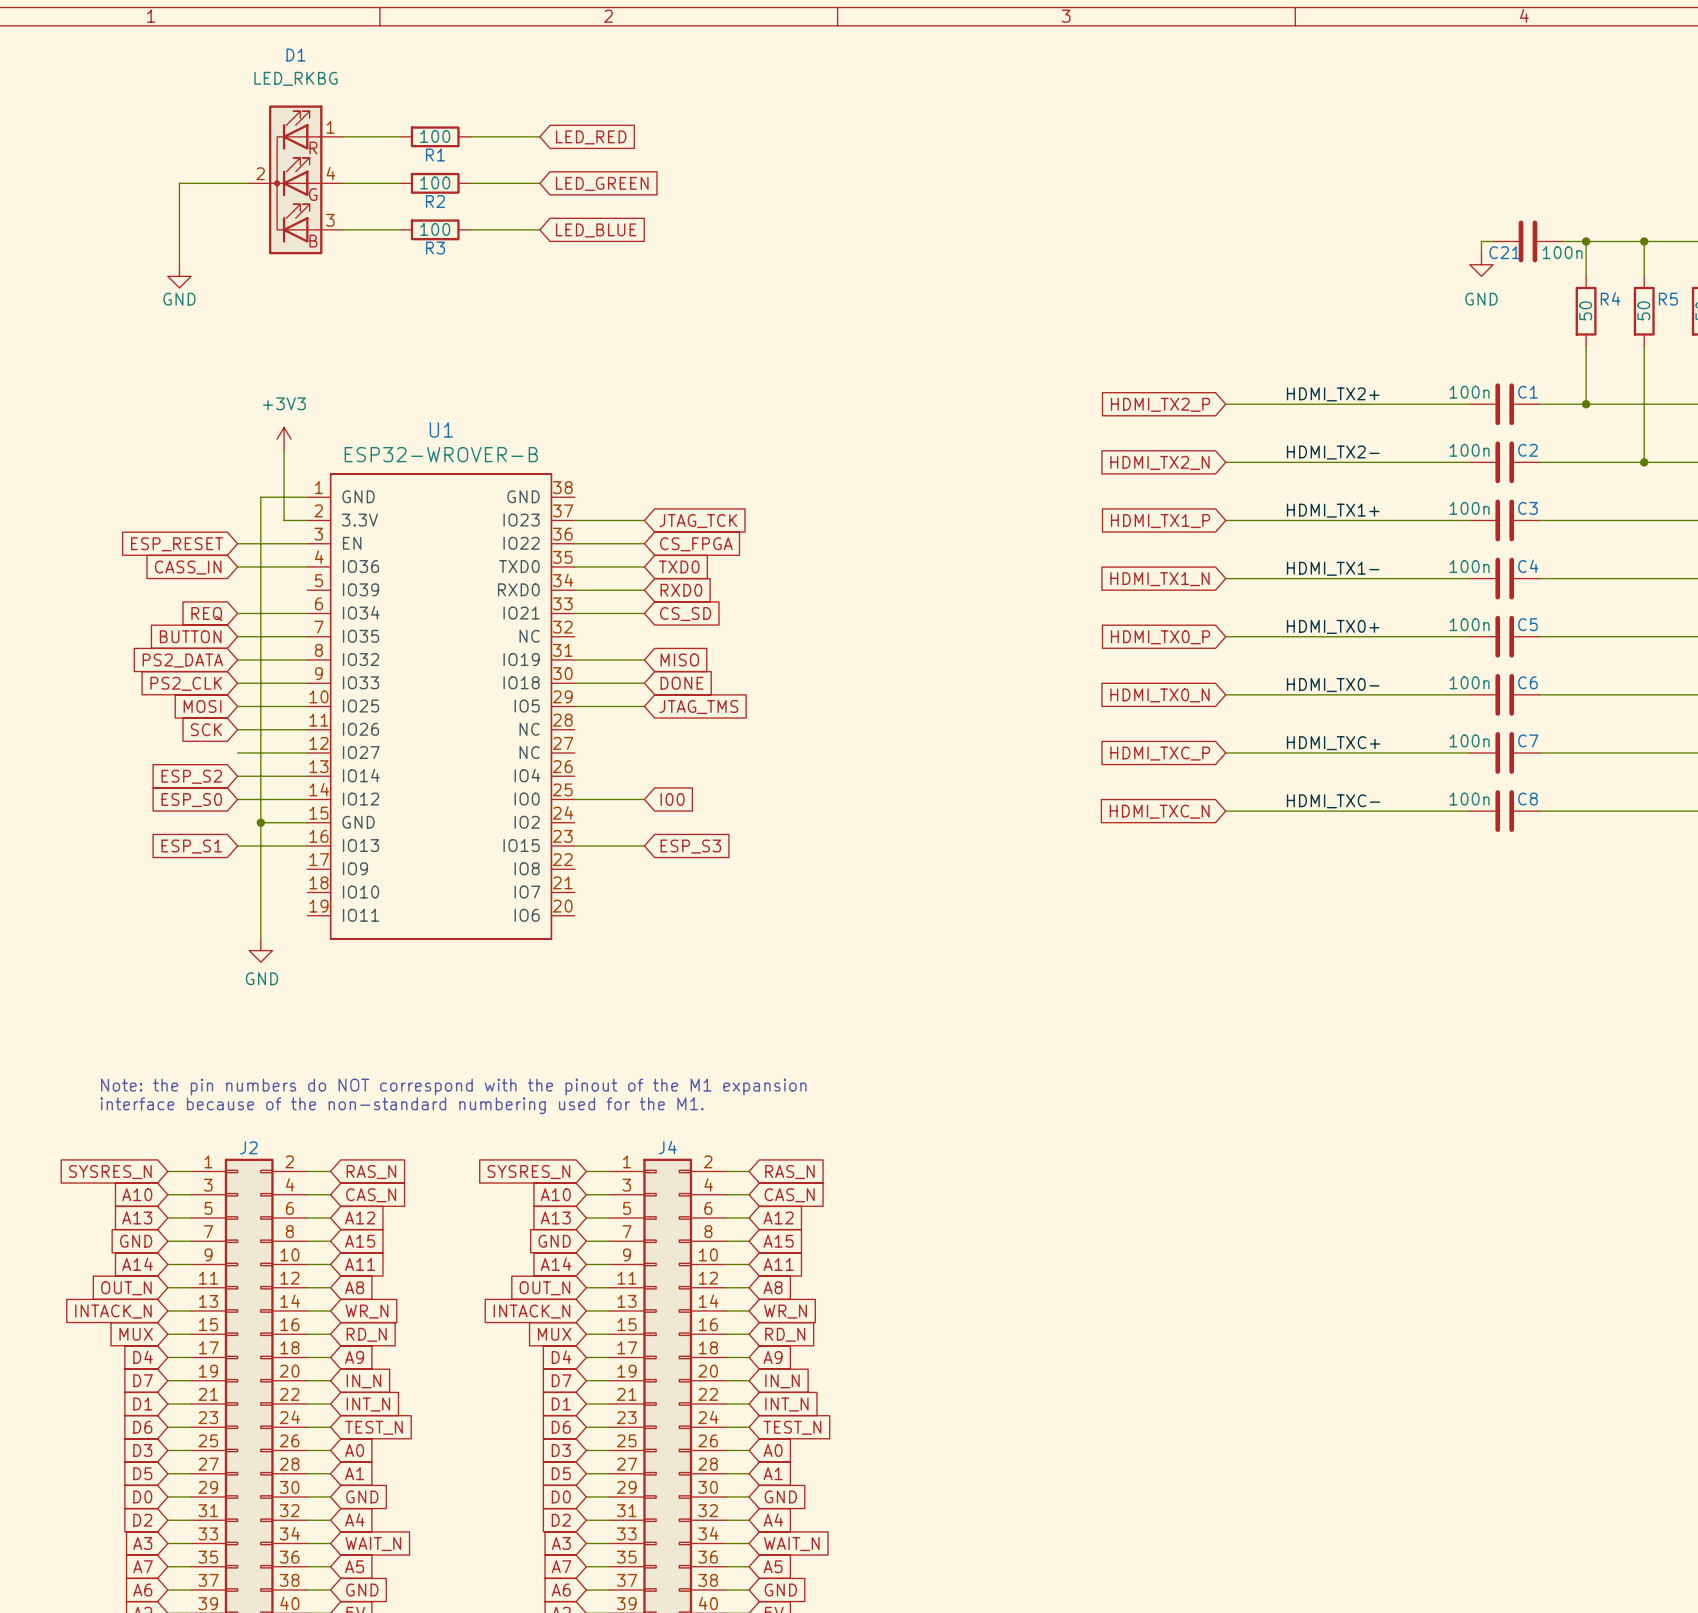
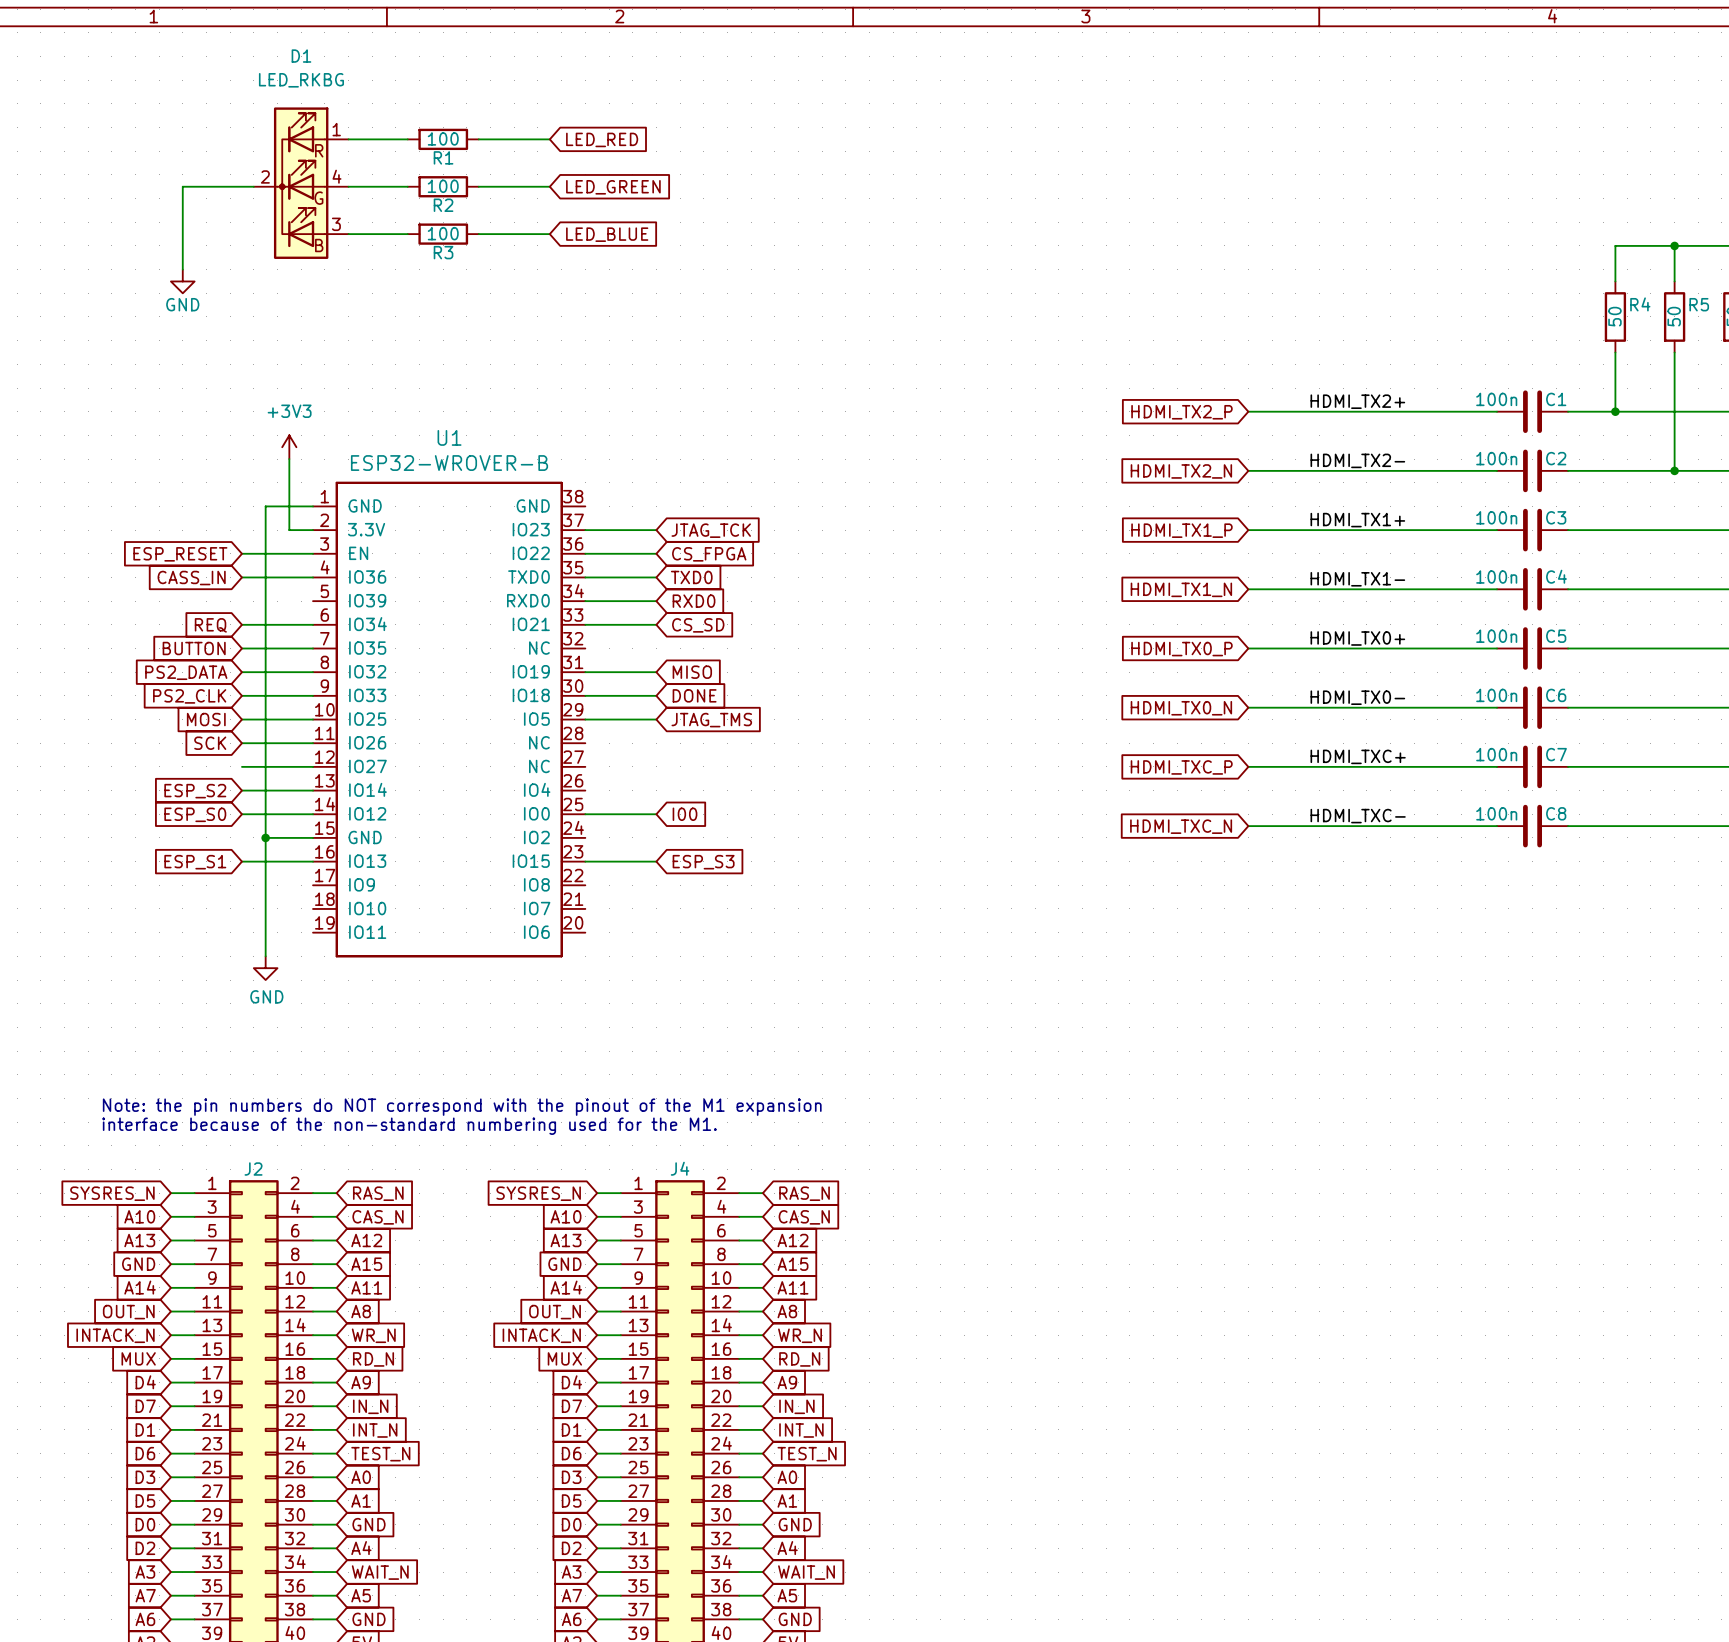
wire: (1493, 241) (1481, 241) (1481, 253) -> none
C21: 100n (1527, 241) -> none
wire: (1562, 241) (1586, 241) -> none
junction: (1586, 241) -> none
power symbol: GND (1481, 264) -> none

